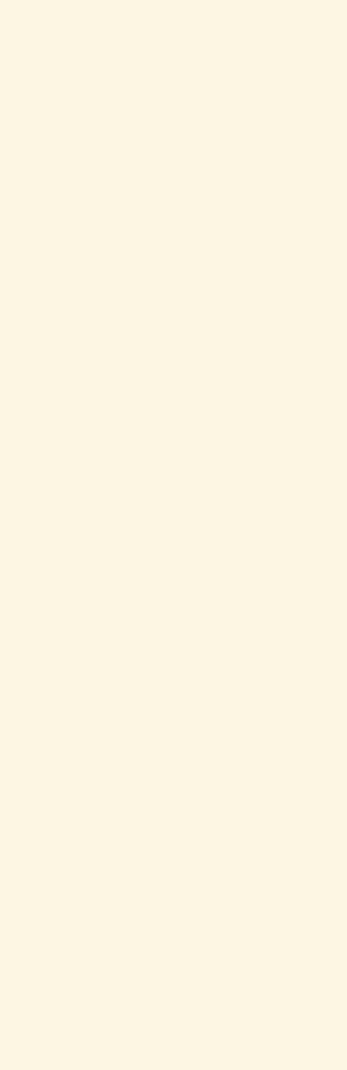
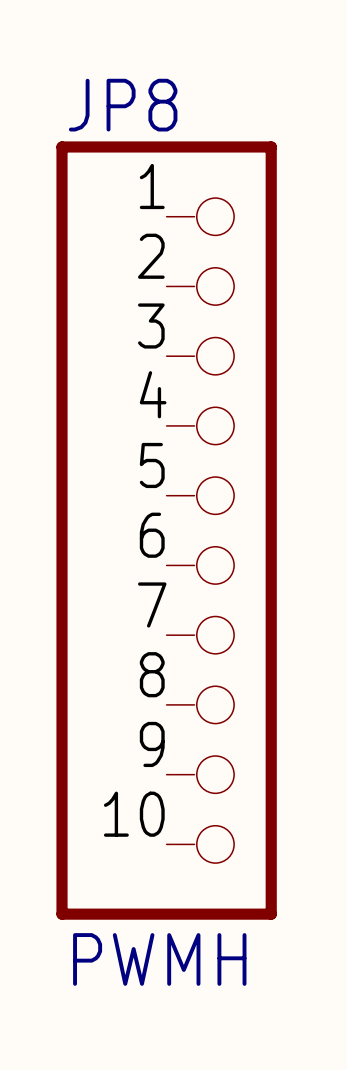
JP8: none -> PWMH (166, 530)

